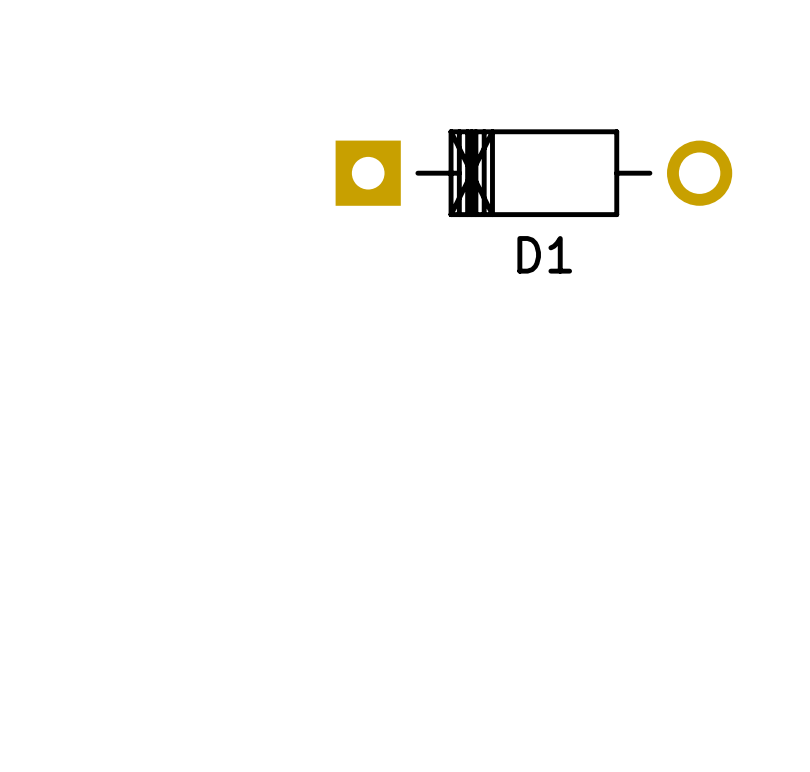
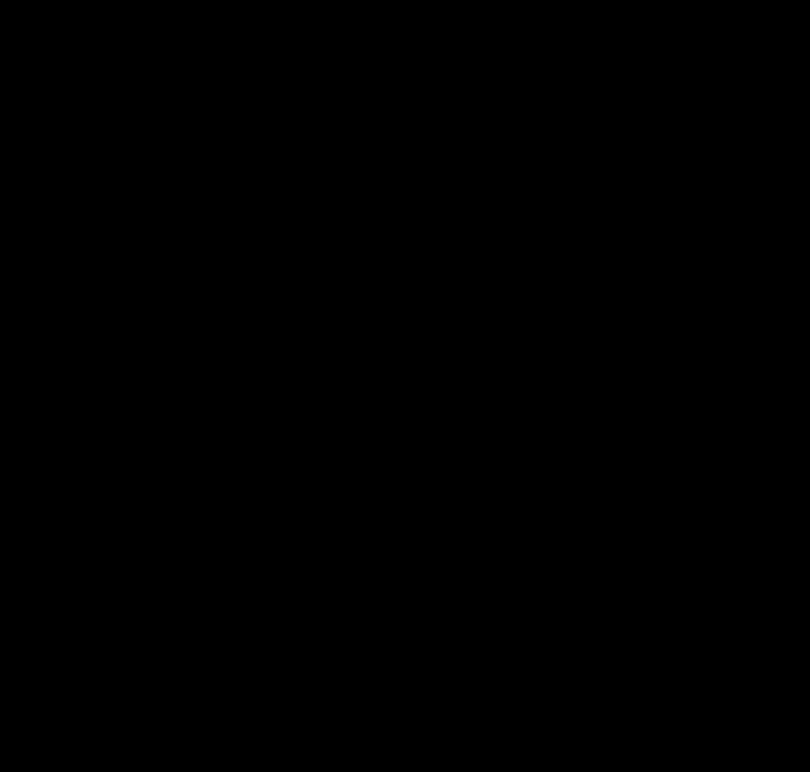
D1: (533, 173) -> none

